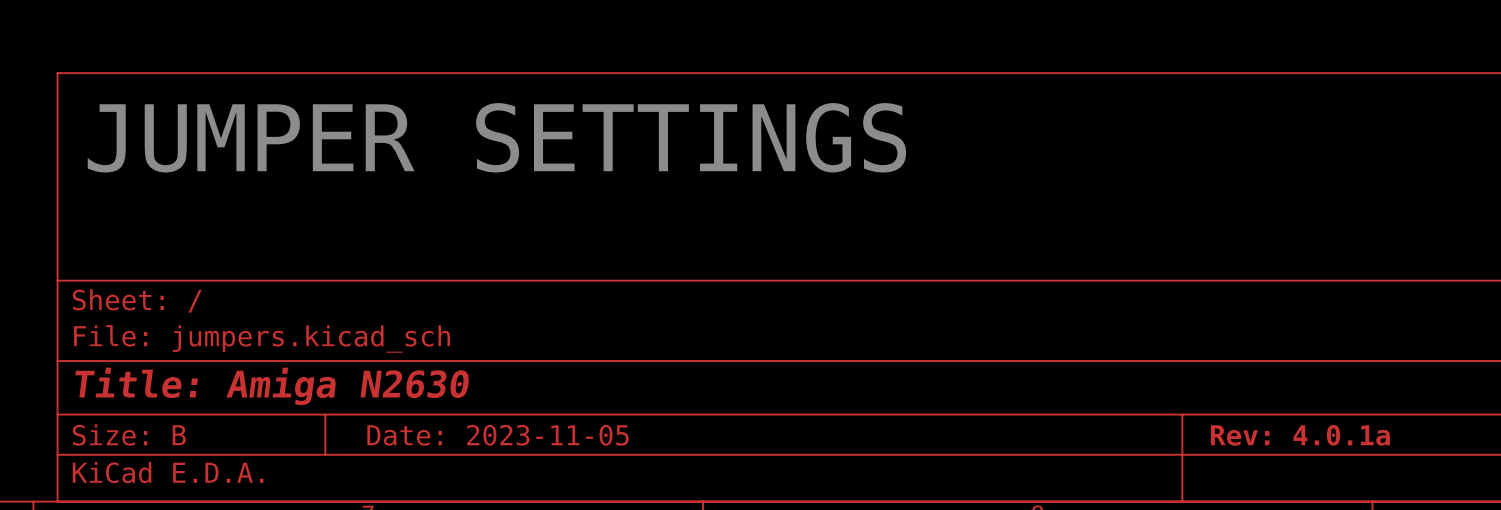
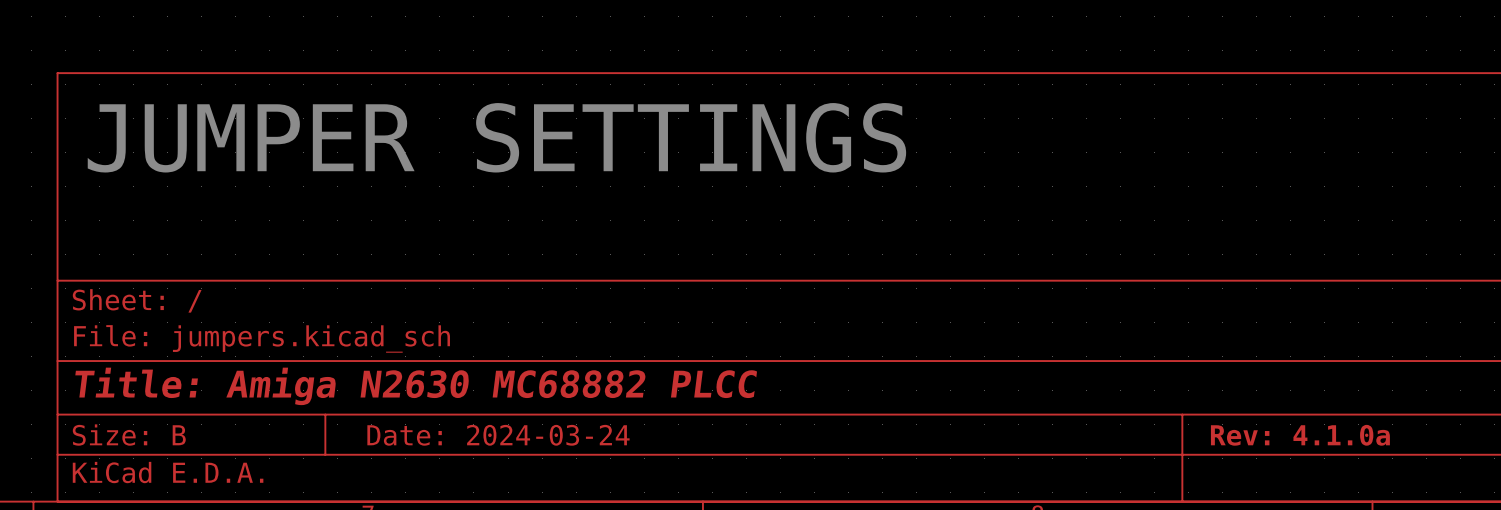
title block: Title: Amiga N2630 (272, 386) -> Title: Amiga N2630 MC68882 PLCC (416, 386)
title block: Date: 2023-11-05 (498, 435) -> Date: 2024-03-24 (498, 435)
title block: Rev: 4.0.1a (1300, 435) -> Rev: 4.1.0a (1300, 435)

